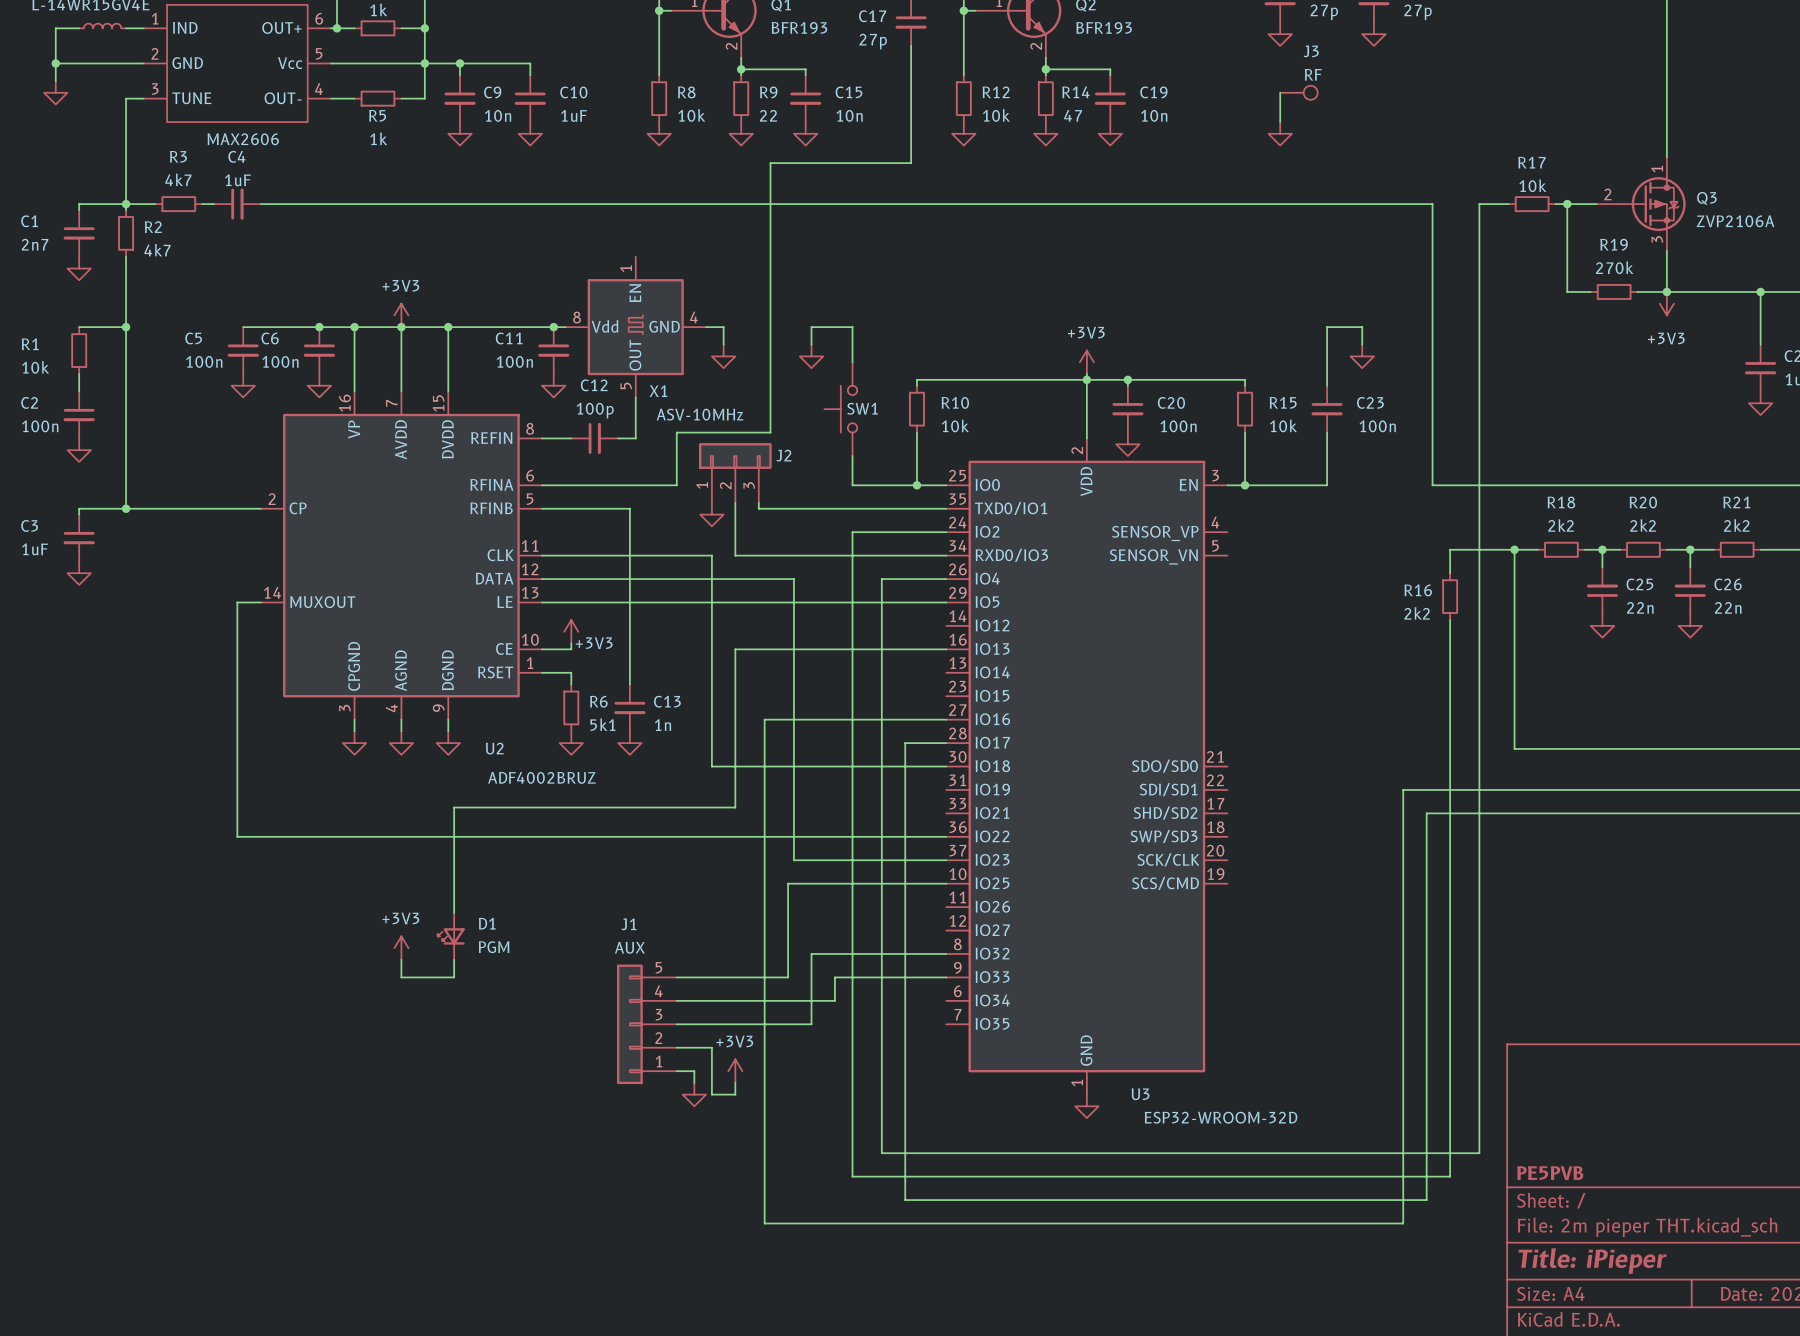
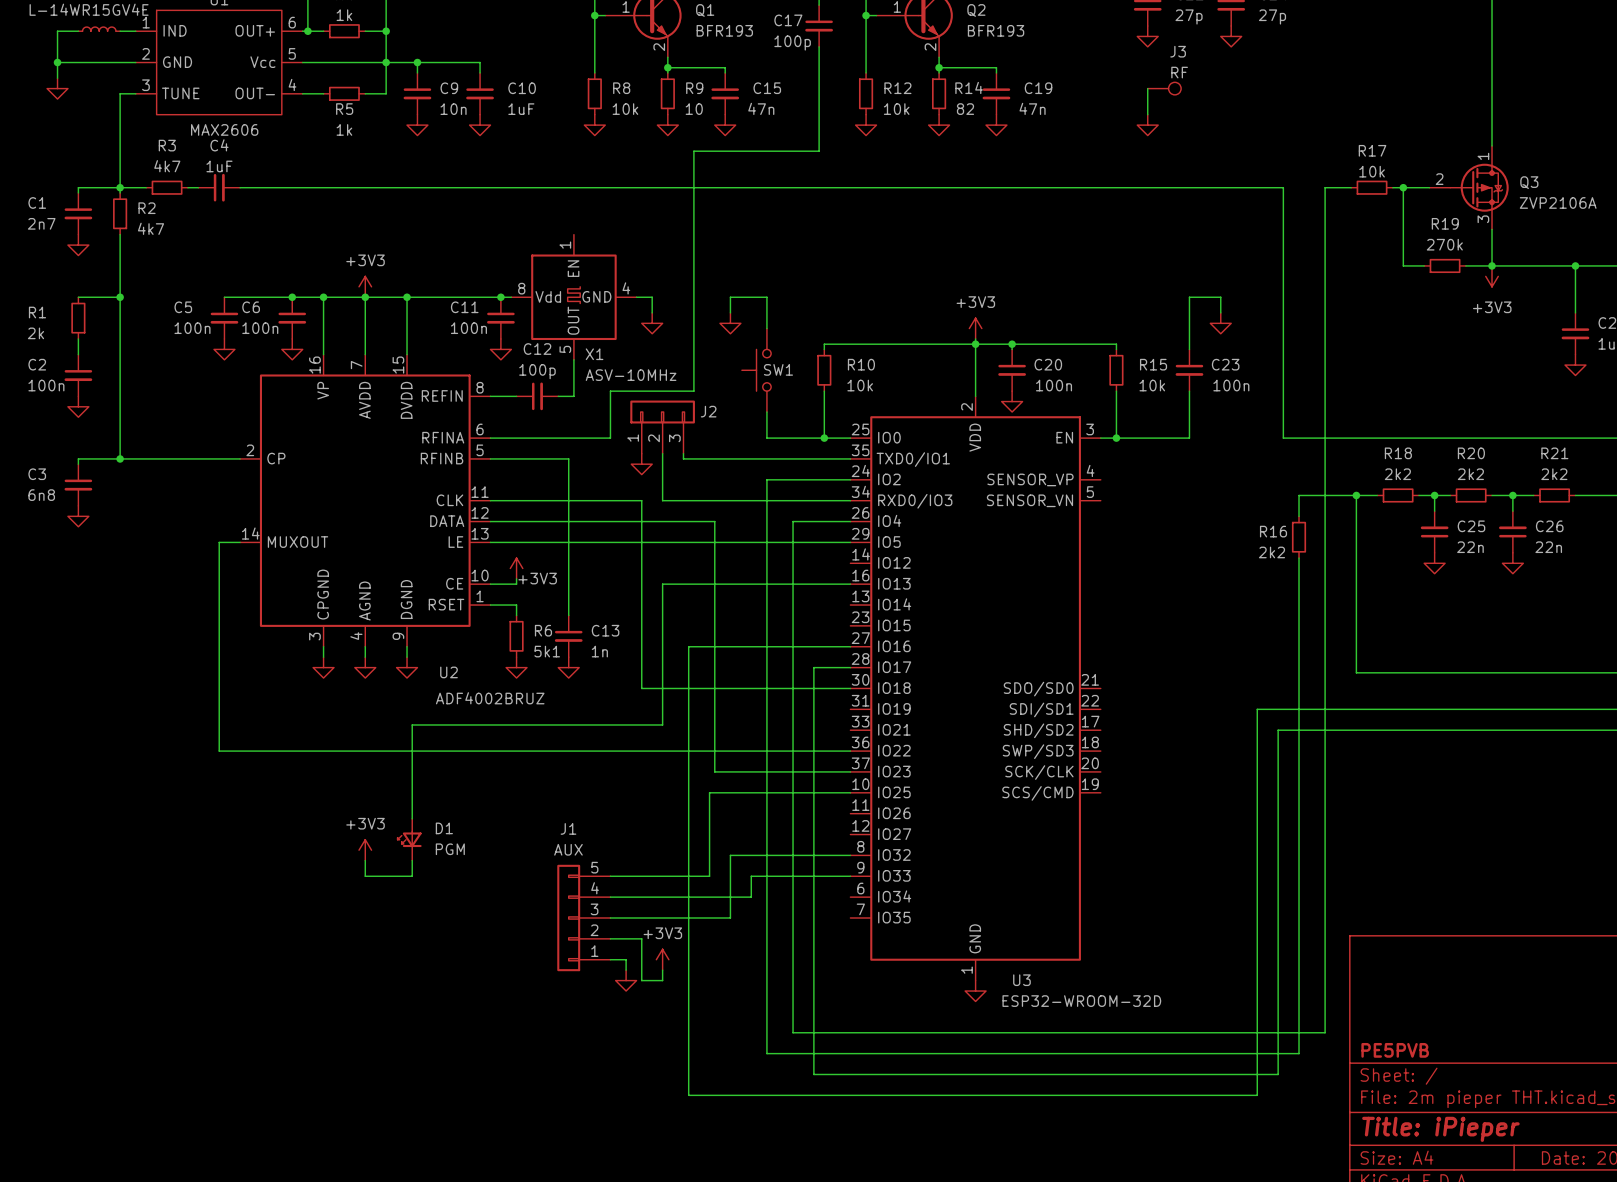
C17 value: 27p (873, 41) -> 100p (792, 43)
R9 value: 22 (768, 115) -> 10 (694, 109)
C15 value: 10n (849, 115) -> 47n (761, 108)
R14 value: 47 (1073, 115) -> 82 (965, 109)
C19 value: 10n (1154, 115) -> 47n (1032, 108)
R1 value: 10k (35, 367) -> 2k (35, 333)
C3 value: 1uF (35, 549) -> 6n8 (41, 495)

